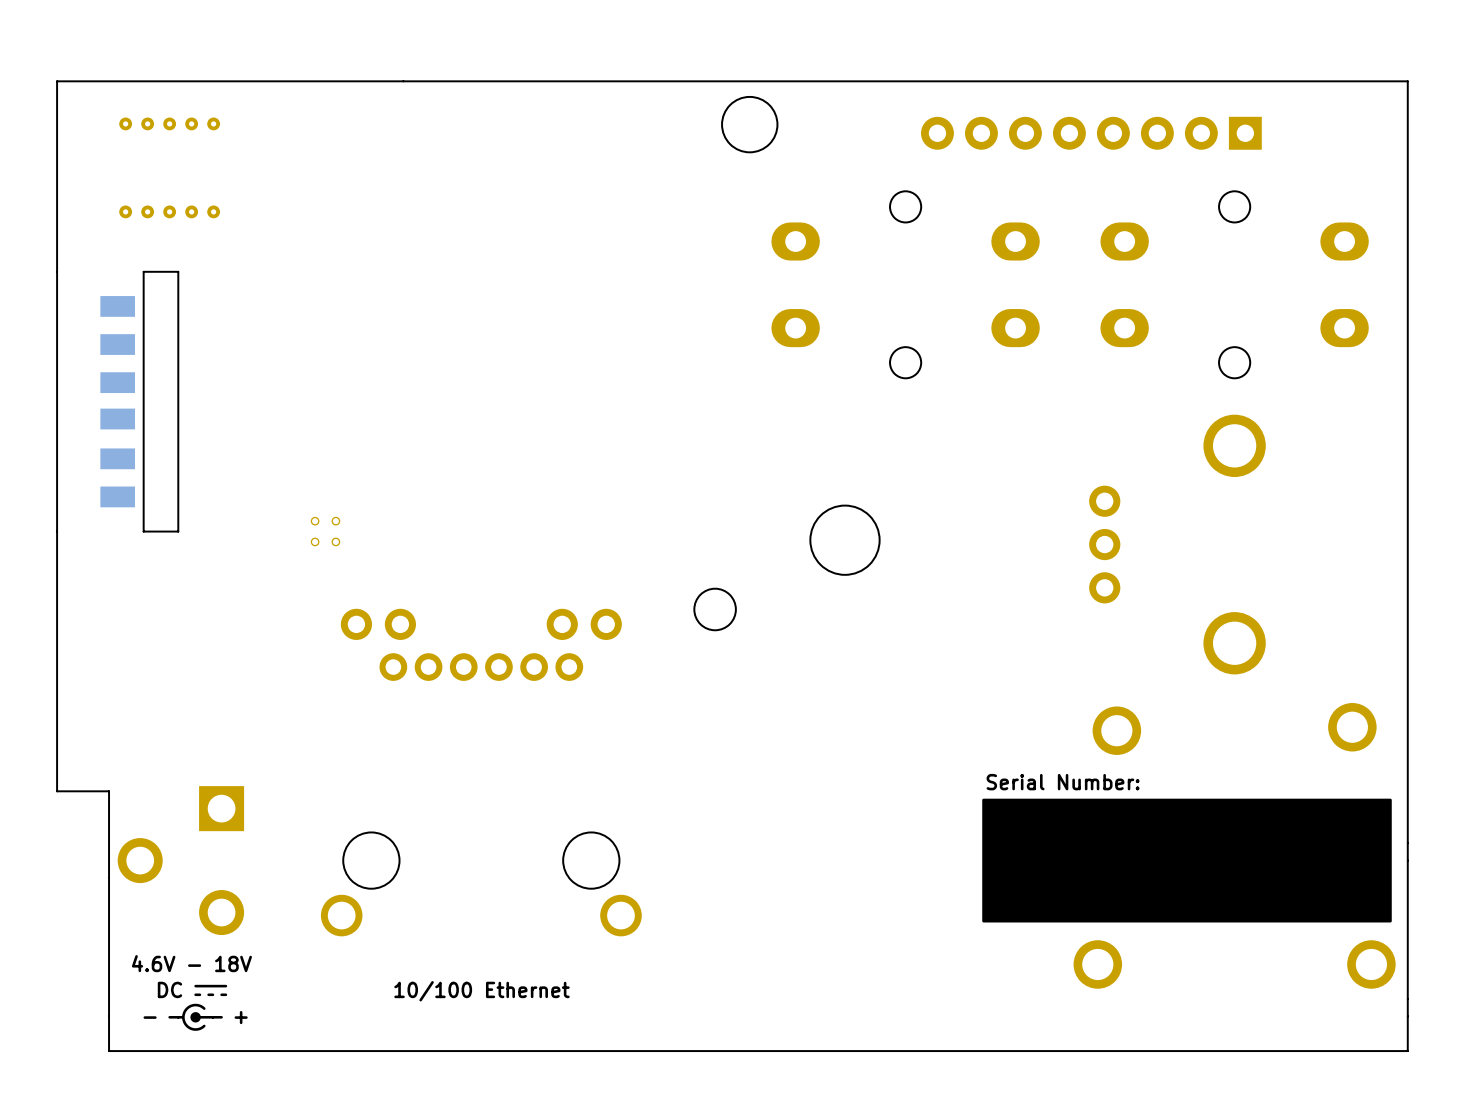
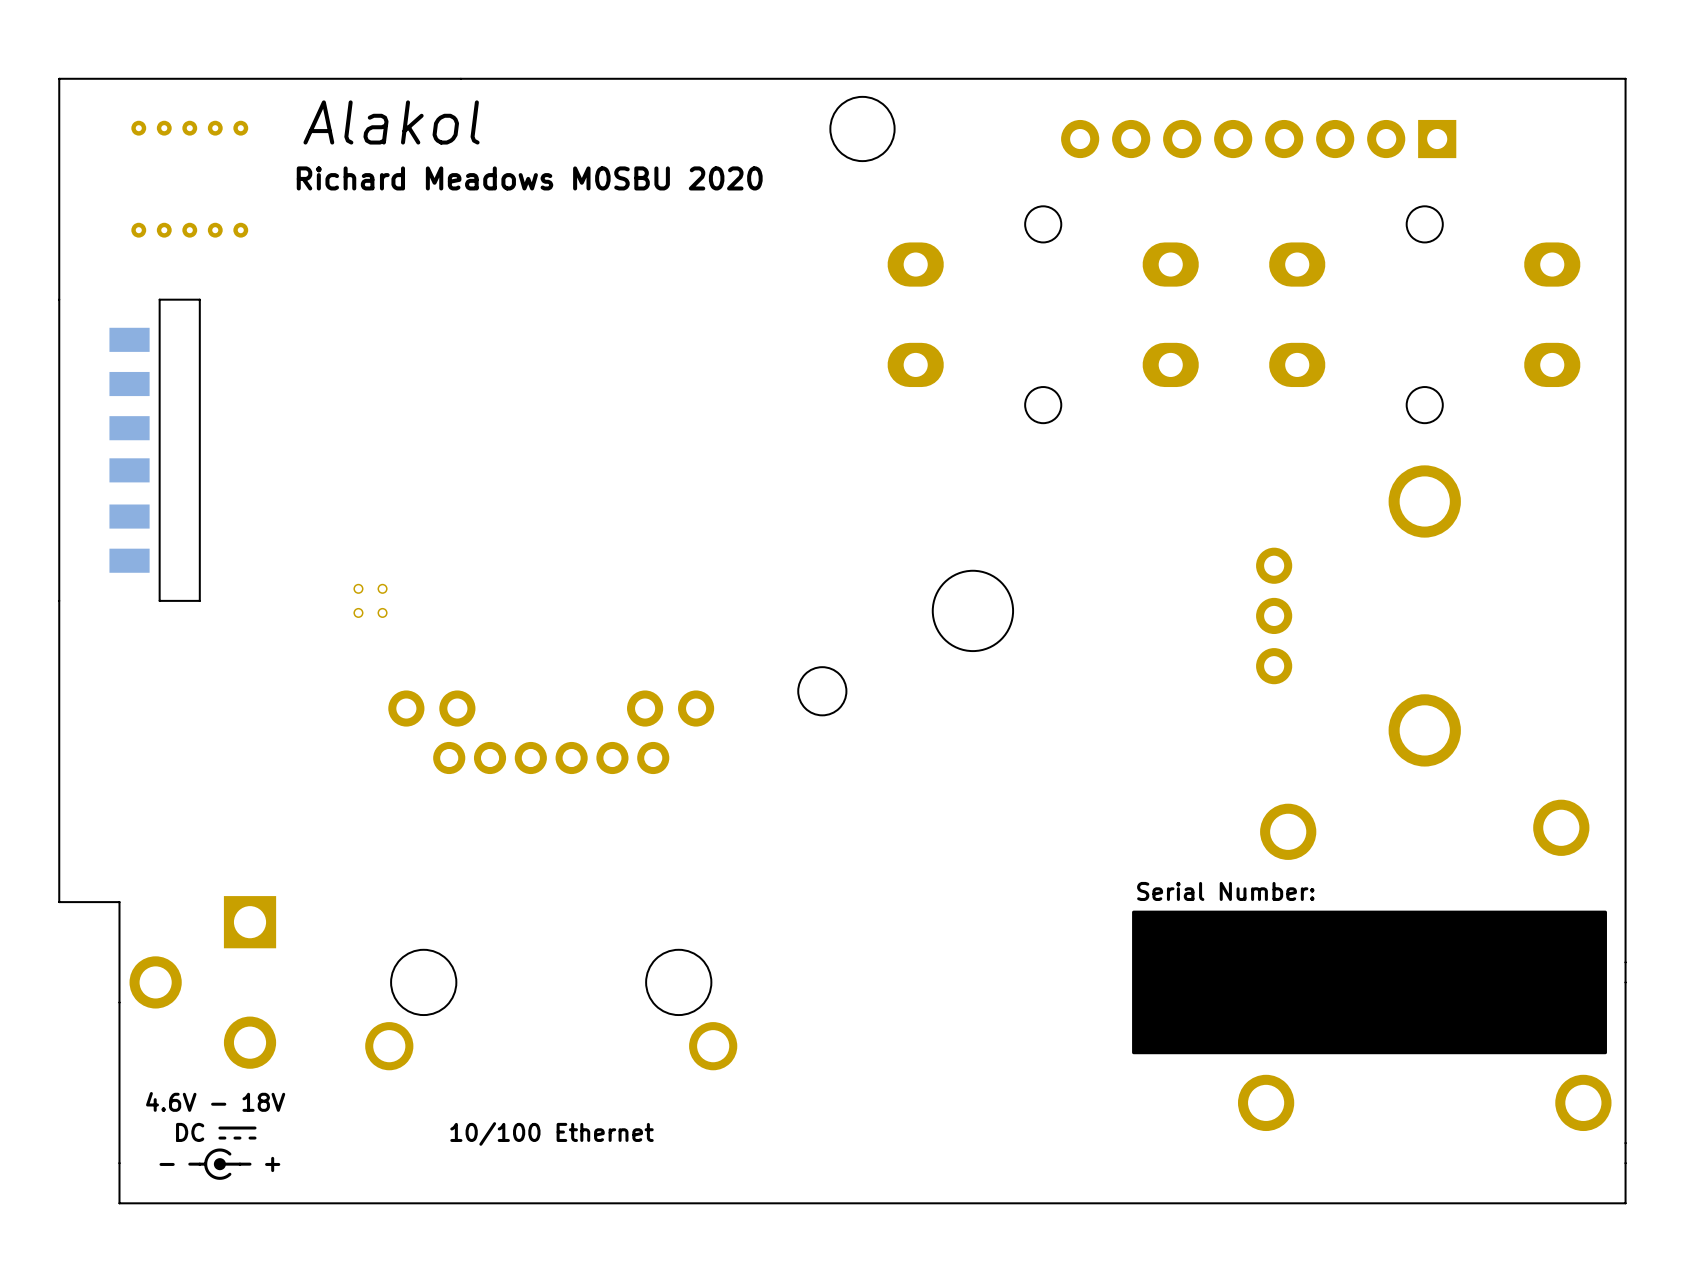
text: none -> Alakol (391, 122)
text: none -> Richard Meadows M0SBU 2020 (529, 178)

